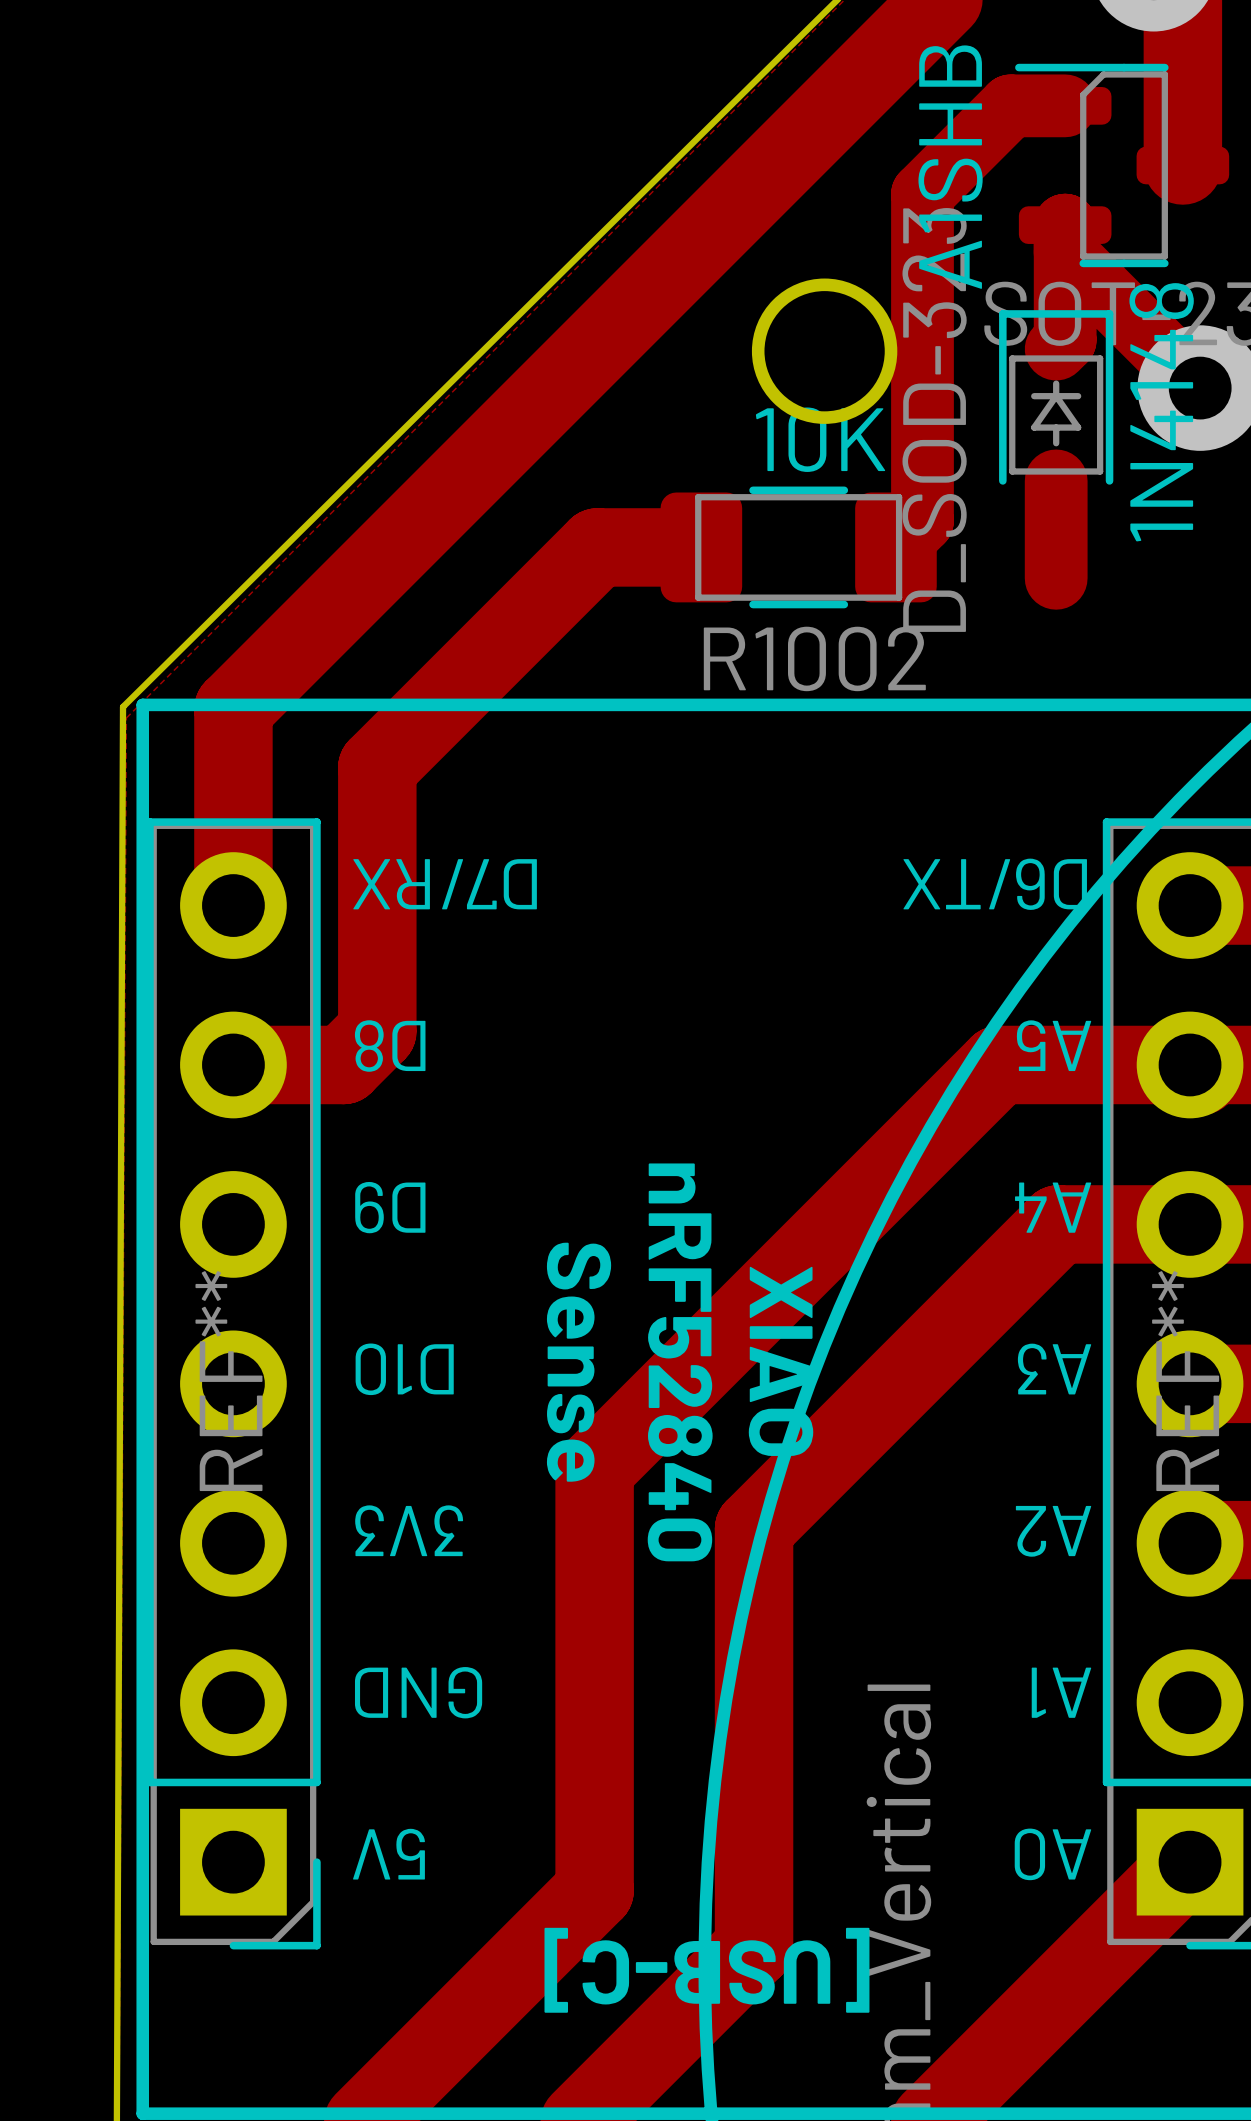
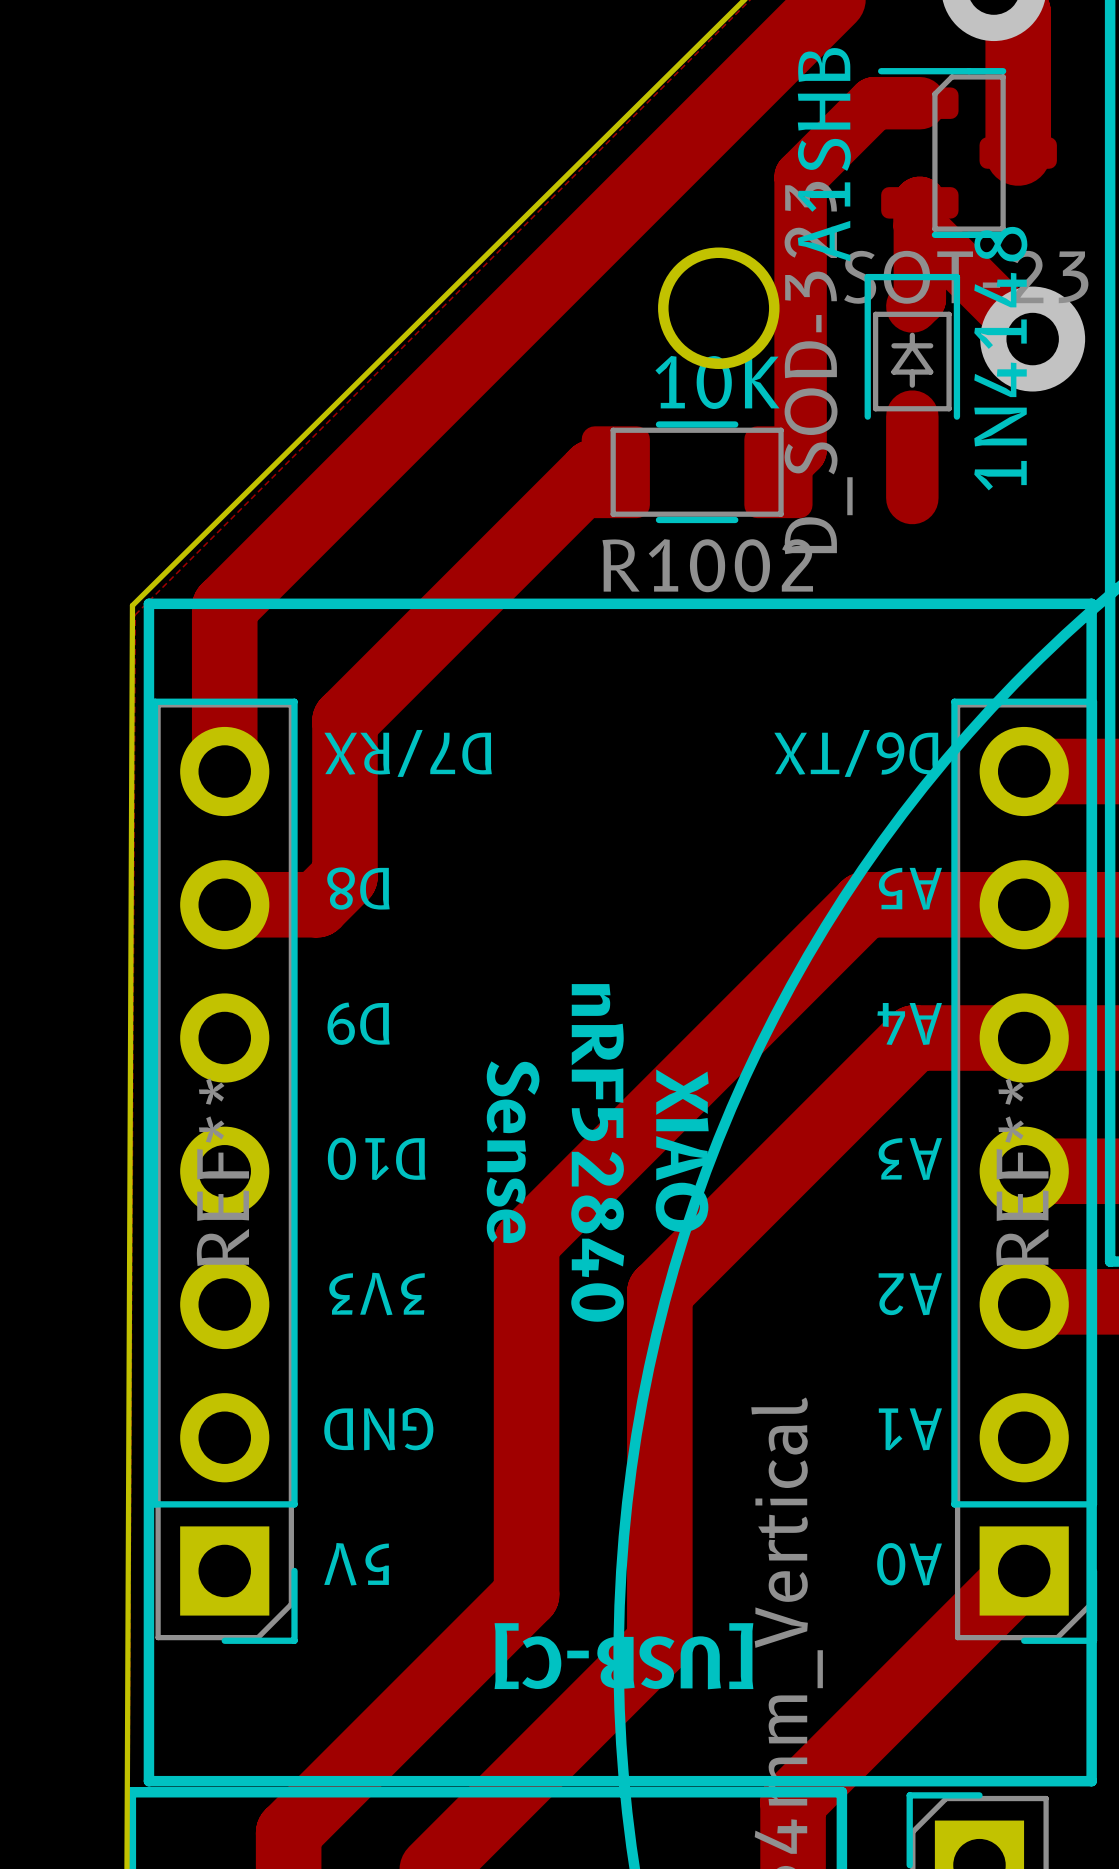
track: (674, 547) (597, 547) (377, 767) (377, 845) -> (593, 472) (344, 720)

